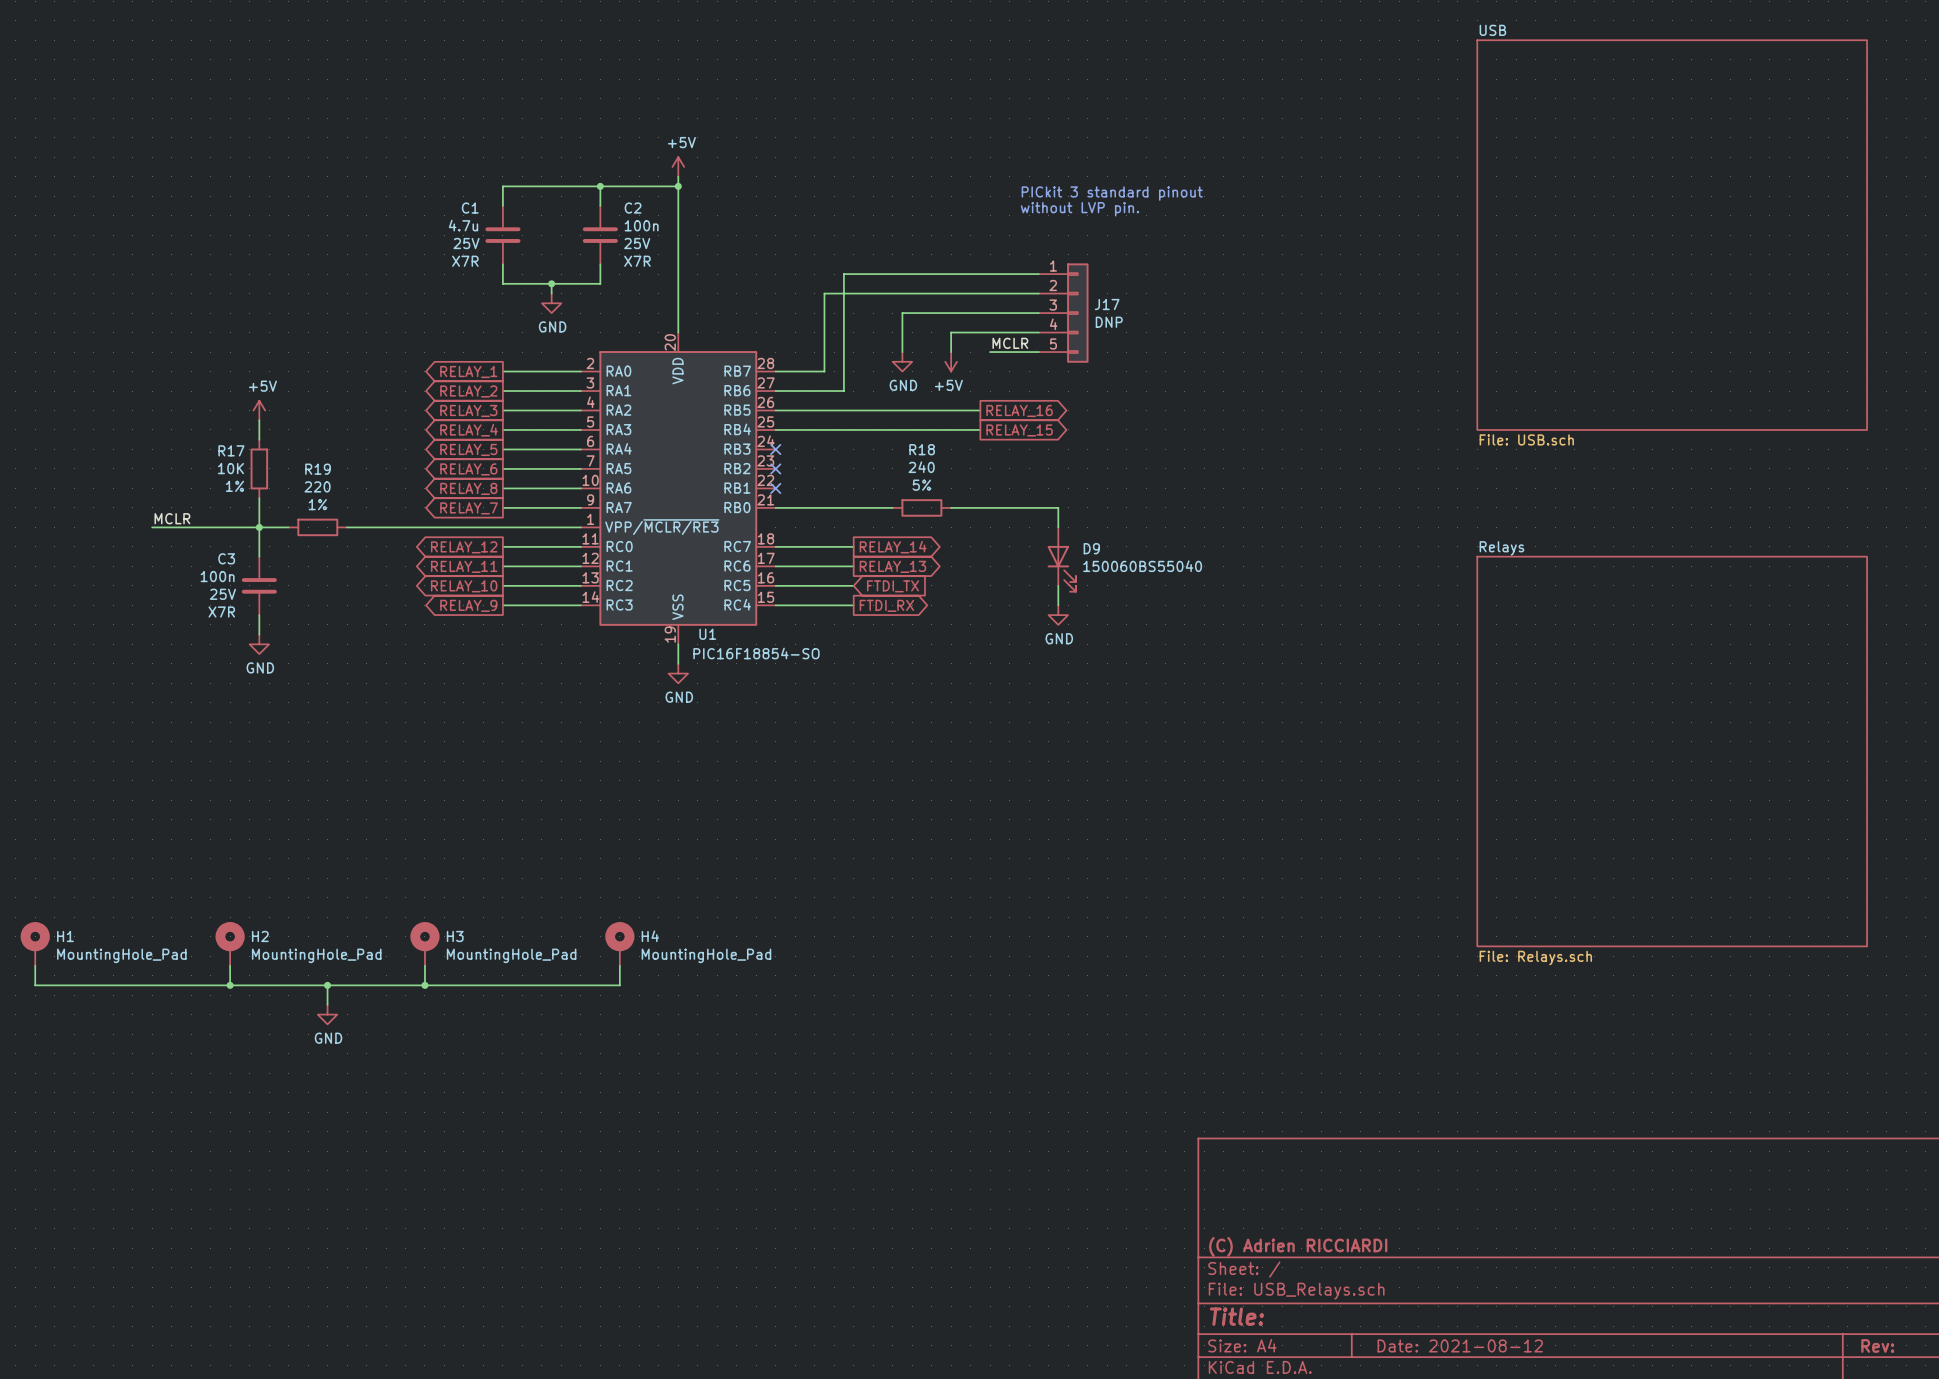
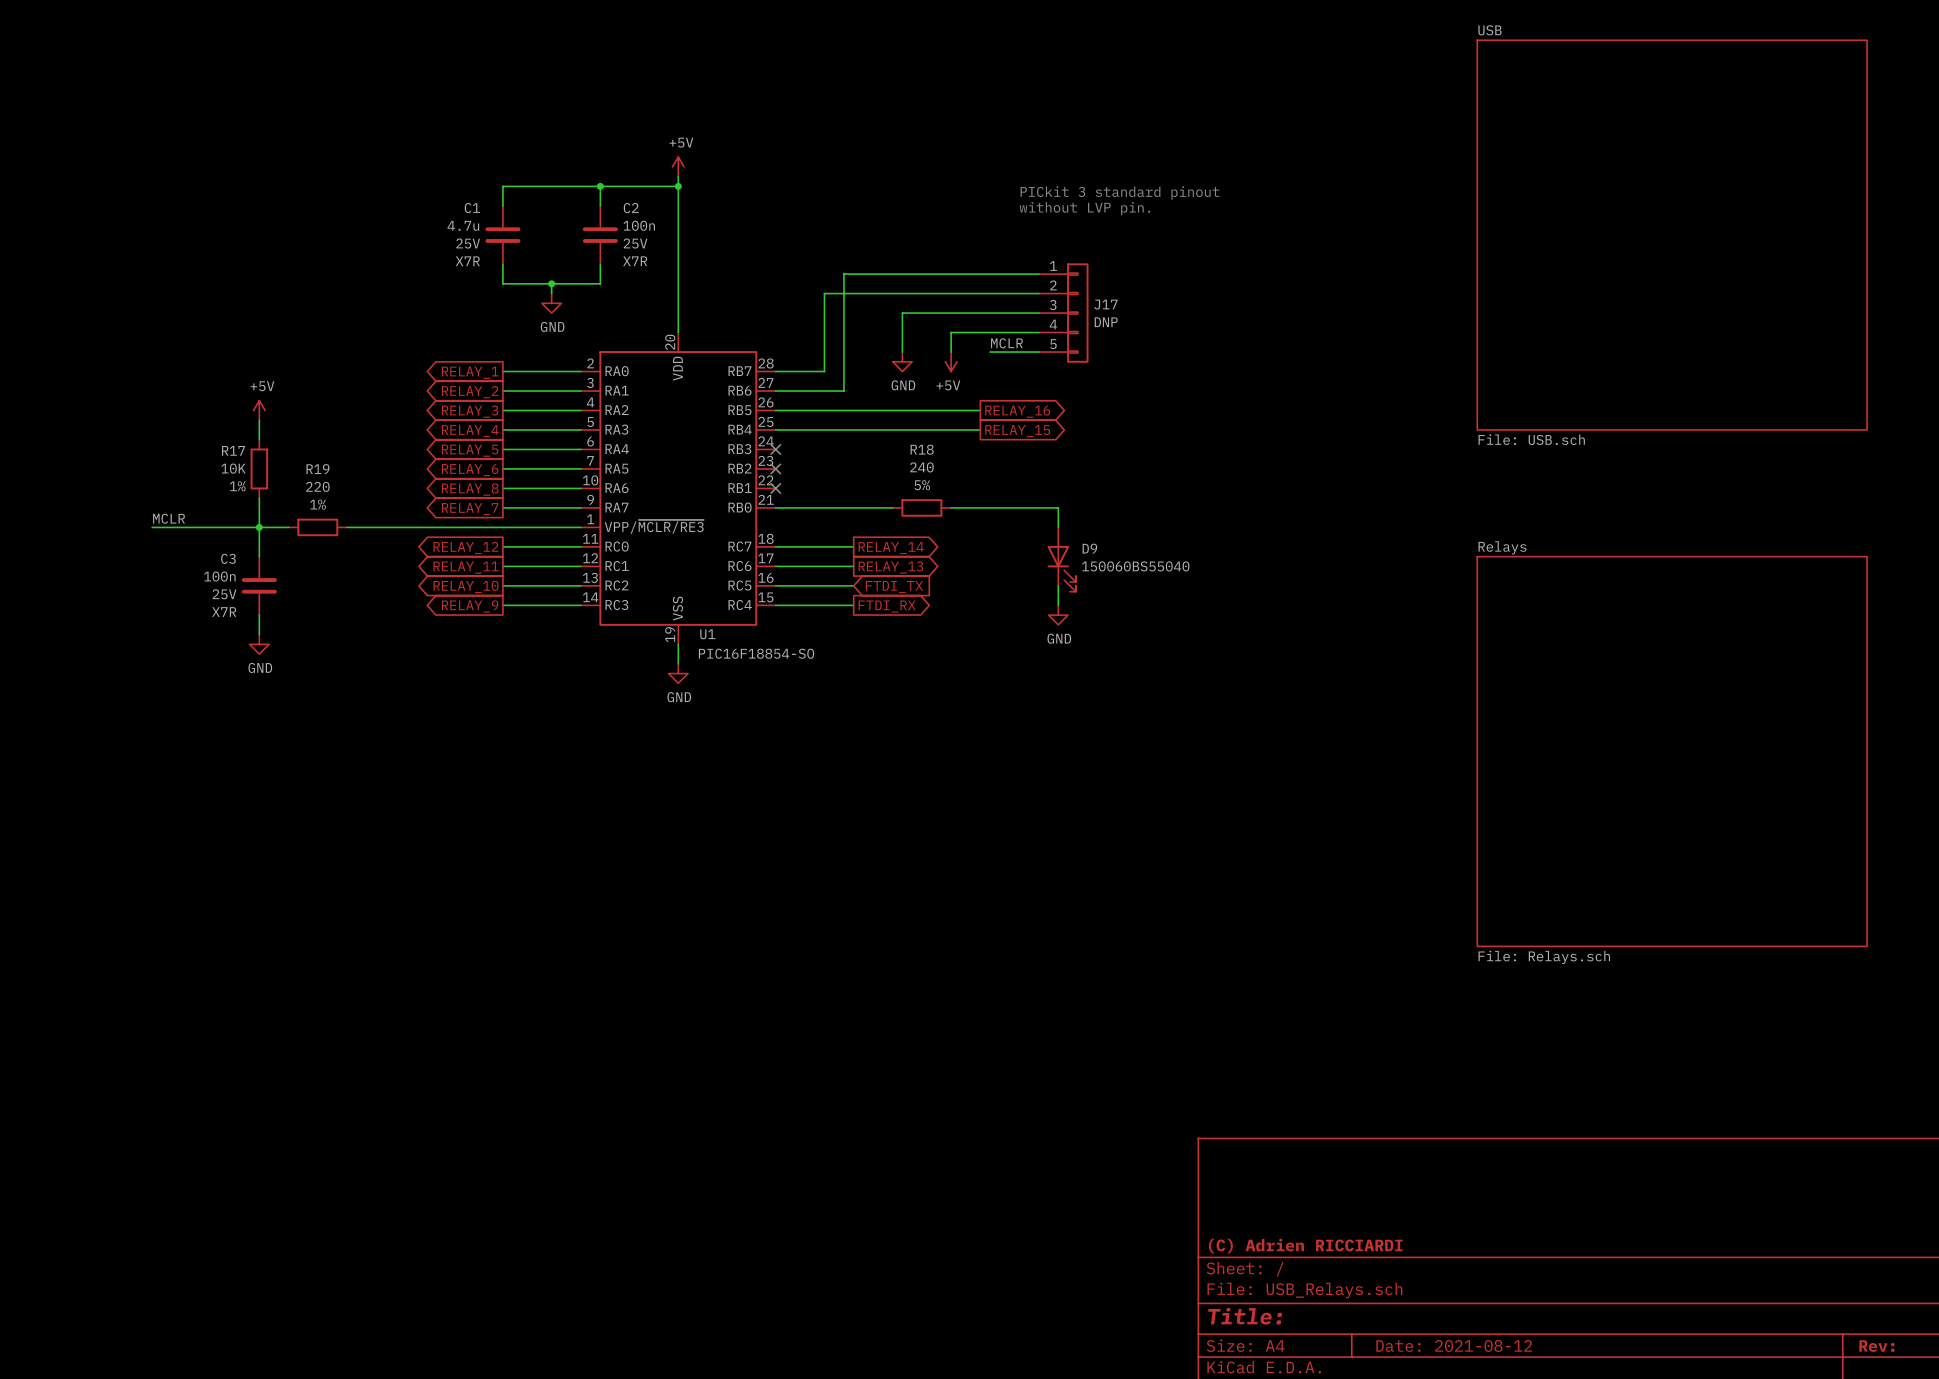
H1: MountingHole_Pad (35, 943) -> none
H2: MountingHole_Pad (230, 943) -> none
H3: MountingHole_Pad (424, 943) -> none
H4: MountingHole_Pad (619, 943) -> none
wire: (35, 965) (35, 985) (619, 985) (619, 965) -> none
wire: (230, 965) (230, 985) -> none
wire: (424, 965) (424, 985) -> none
junction: (230, 985) -> none
wire: (327, 985) (327, 1004) -> none
junction: (327, 985) -> none
junction: (424, 985) -> none
power symbol: GND (327, 1014) -> none

